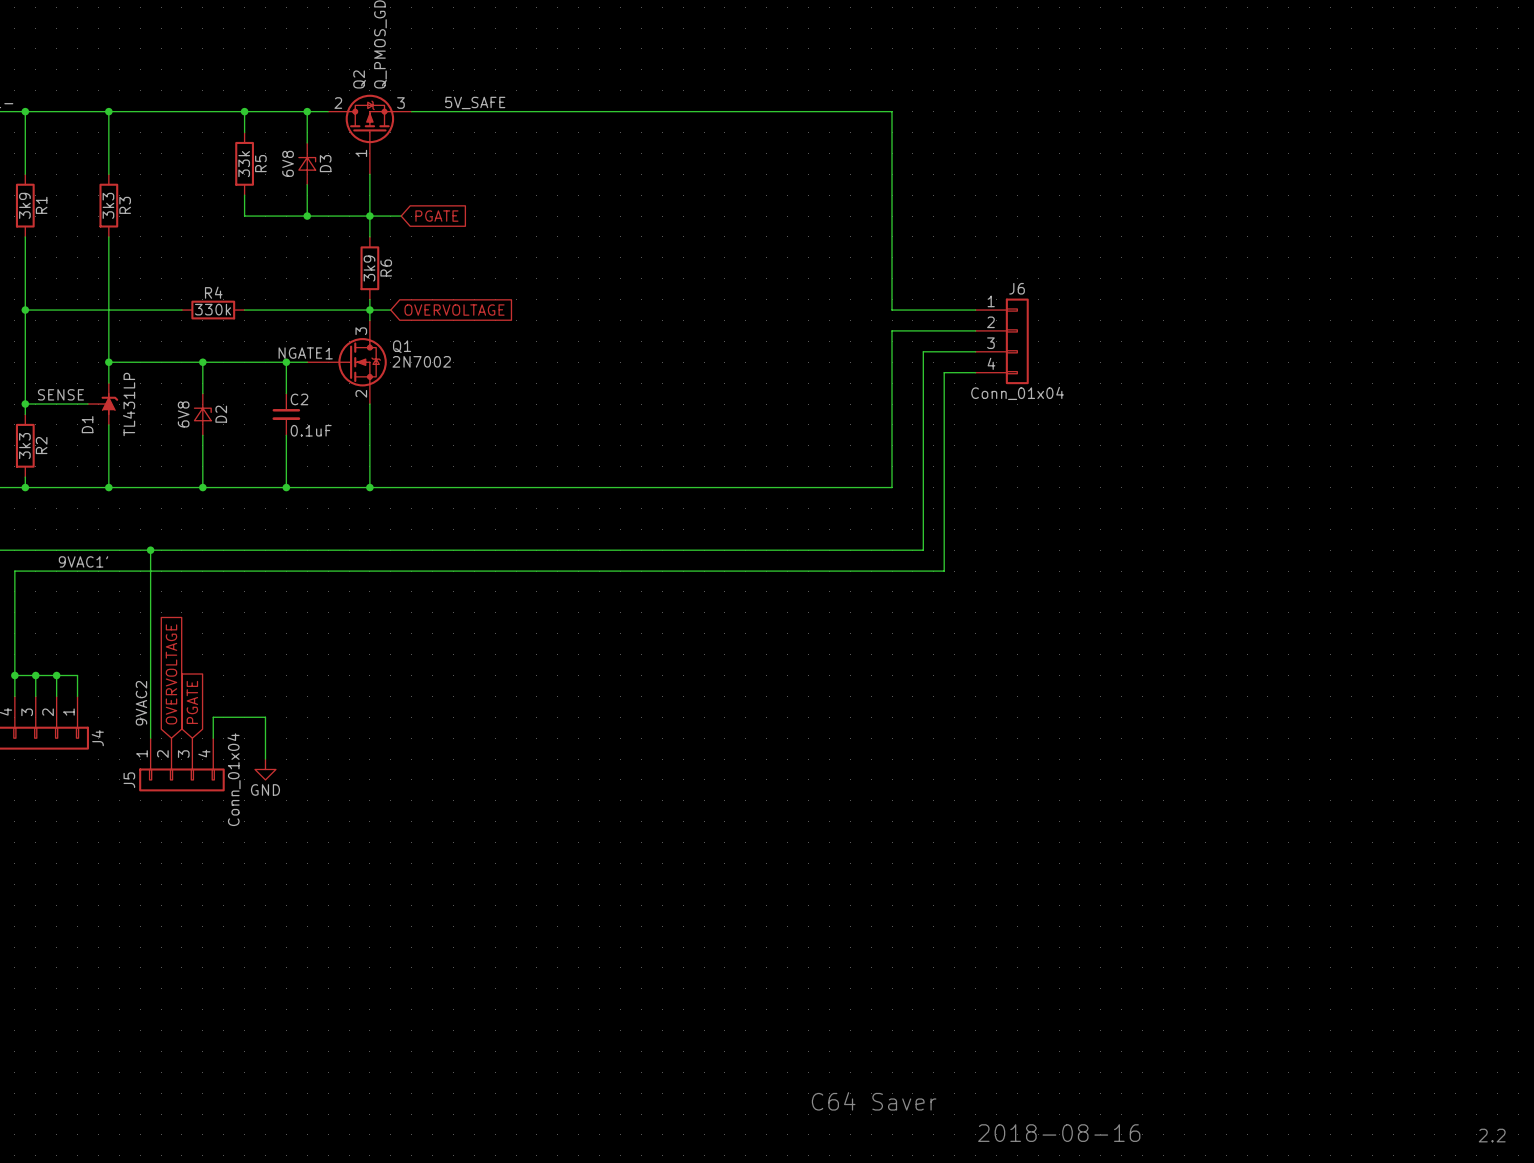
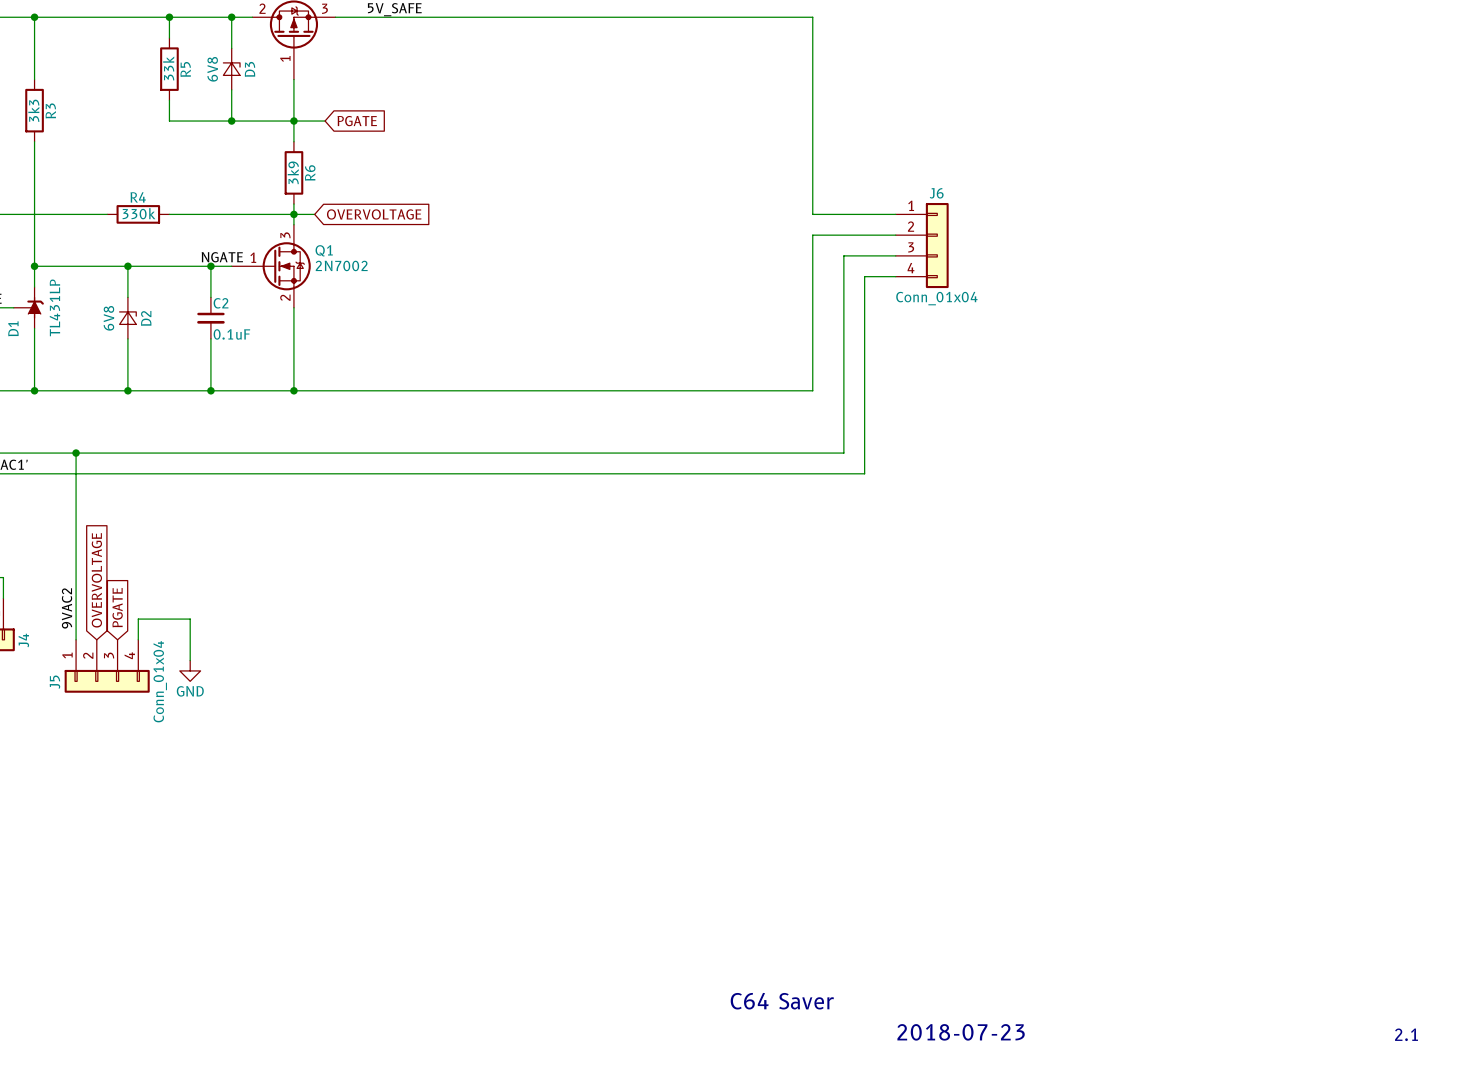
text: 2018-08-16 (1059, 1133) -> 2018-07-23 (961, 1032)
text: 2.2 (1492, 1135) -> 2.1 (1406, 1034)

